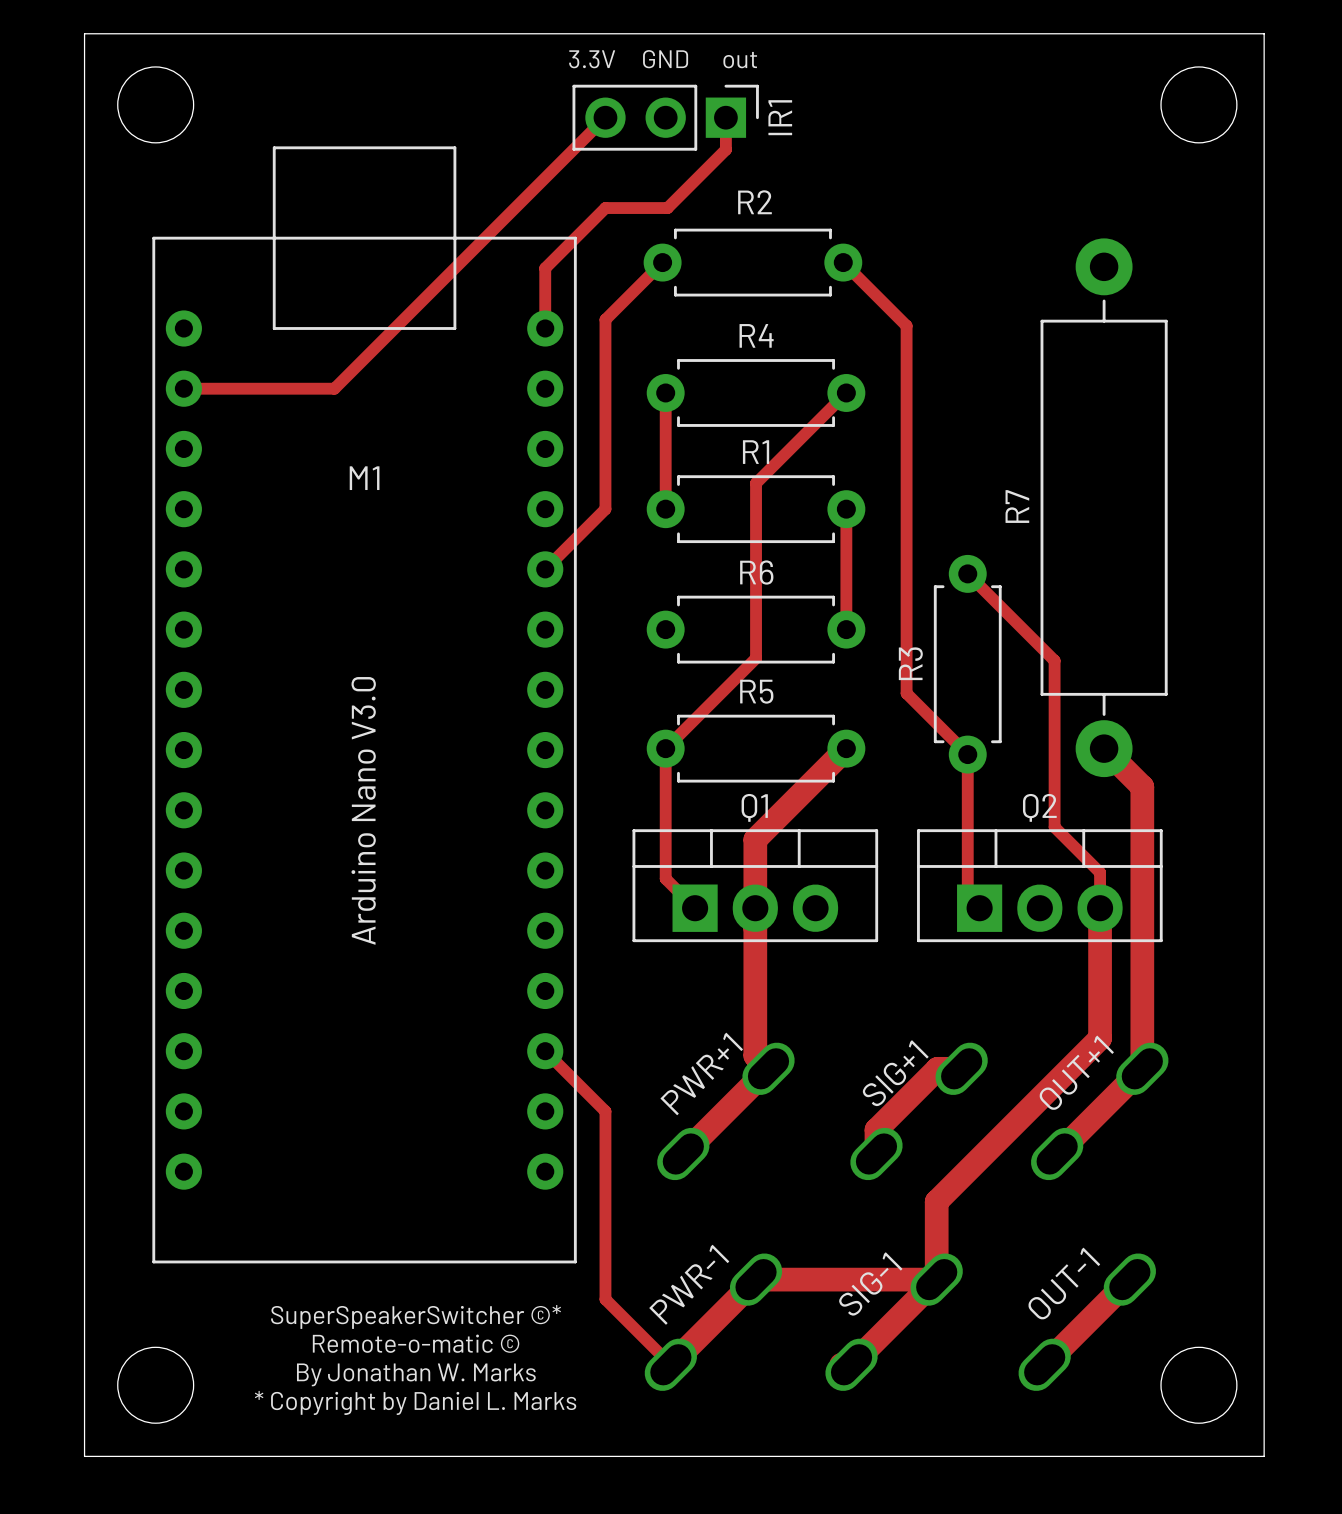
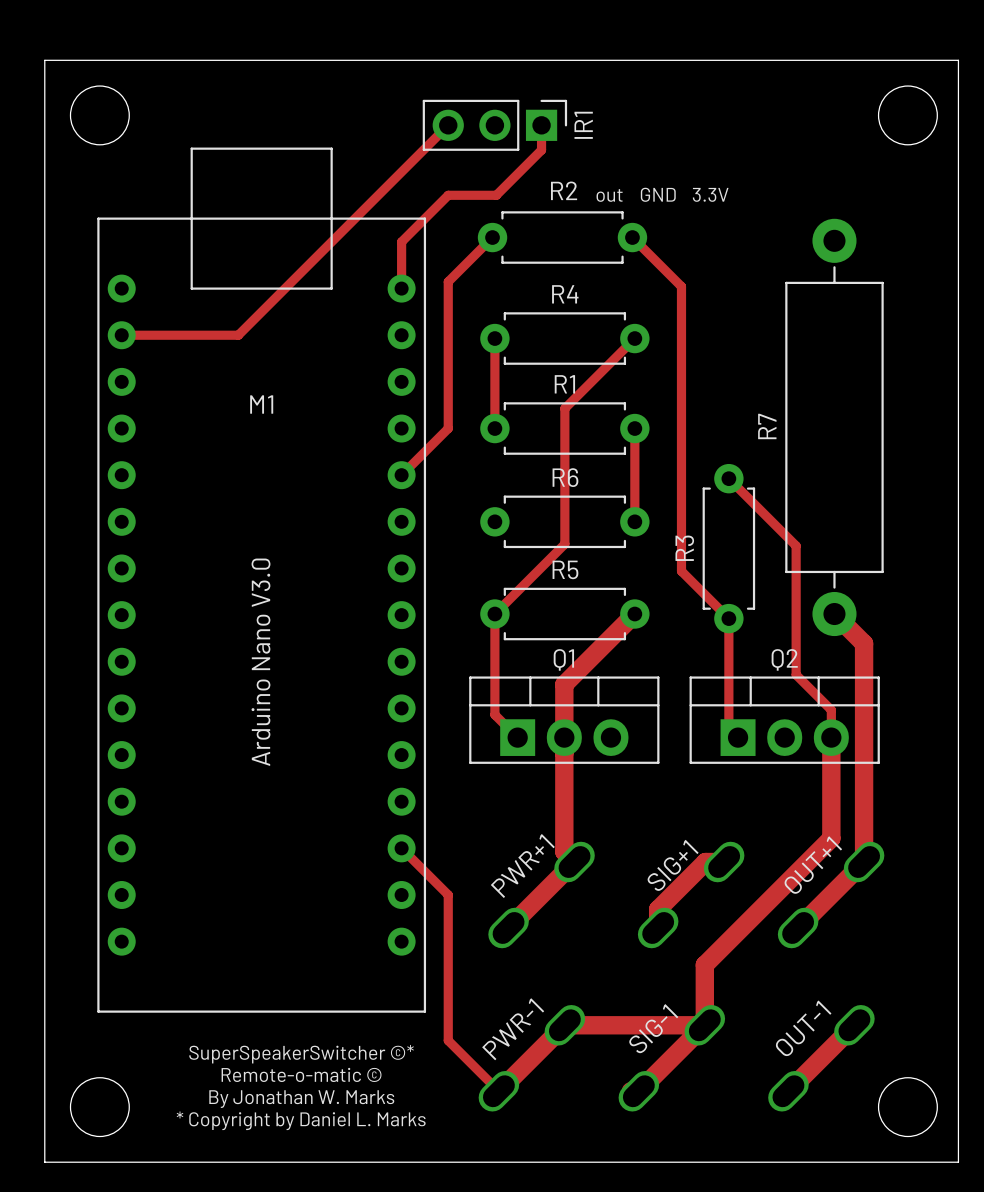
text position: 3.3V (592, 59) -> 3.3V (710, 194)
text position: GND (665, 59) -> GND (658, 194)
text position: out (740, 60) -> out (609, 195)

